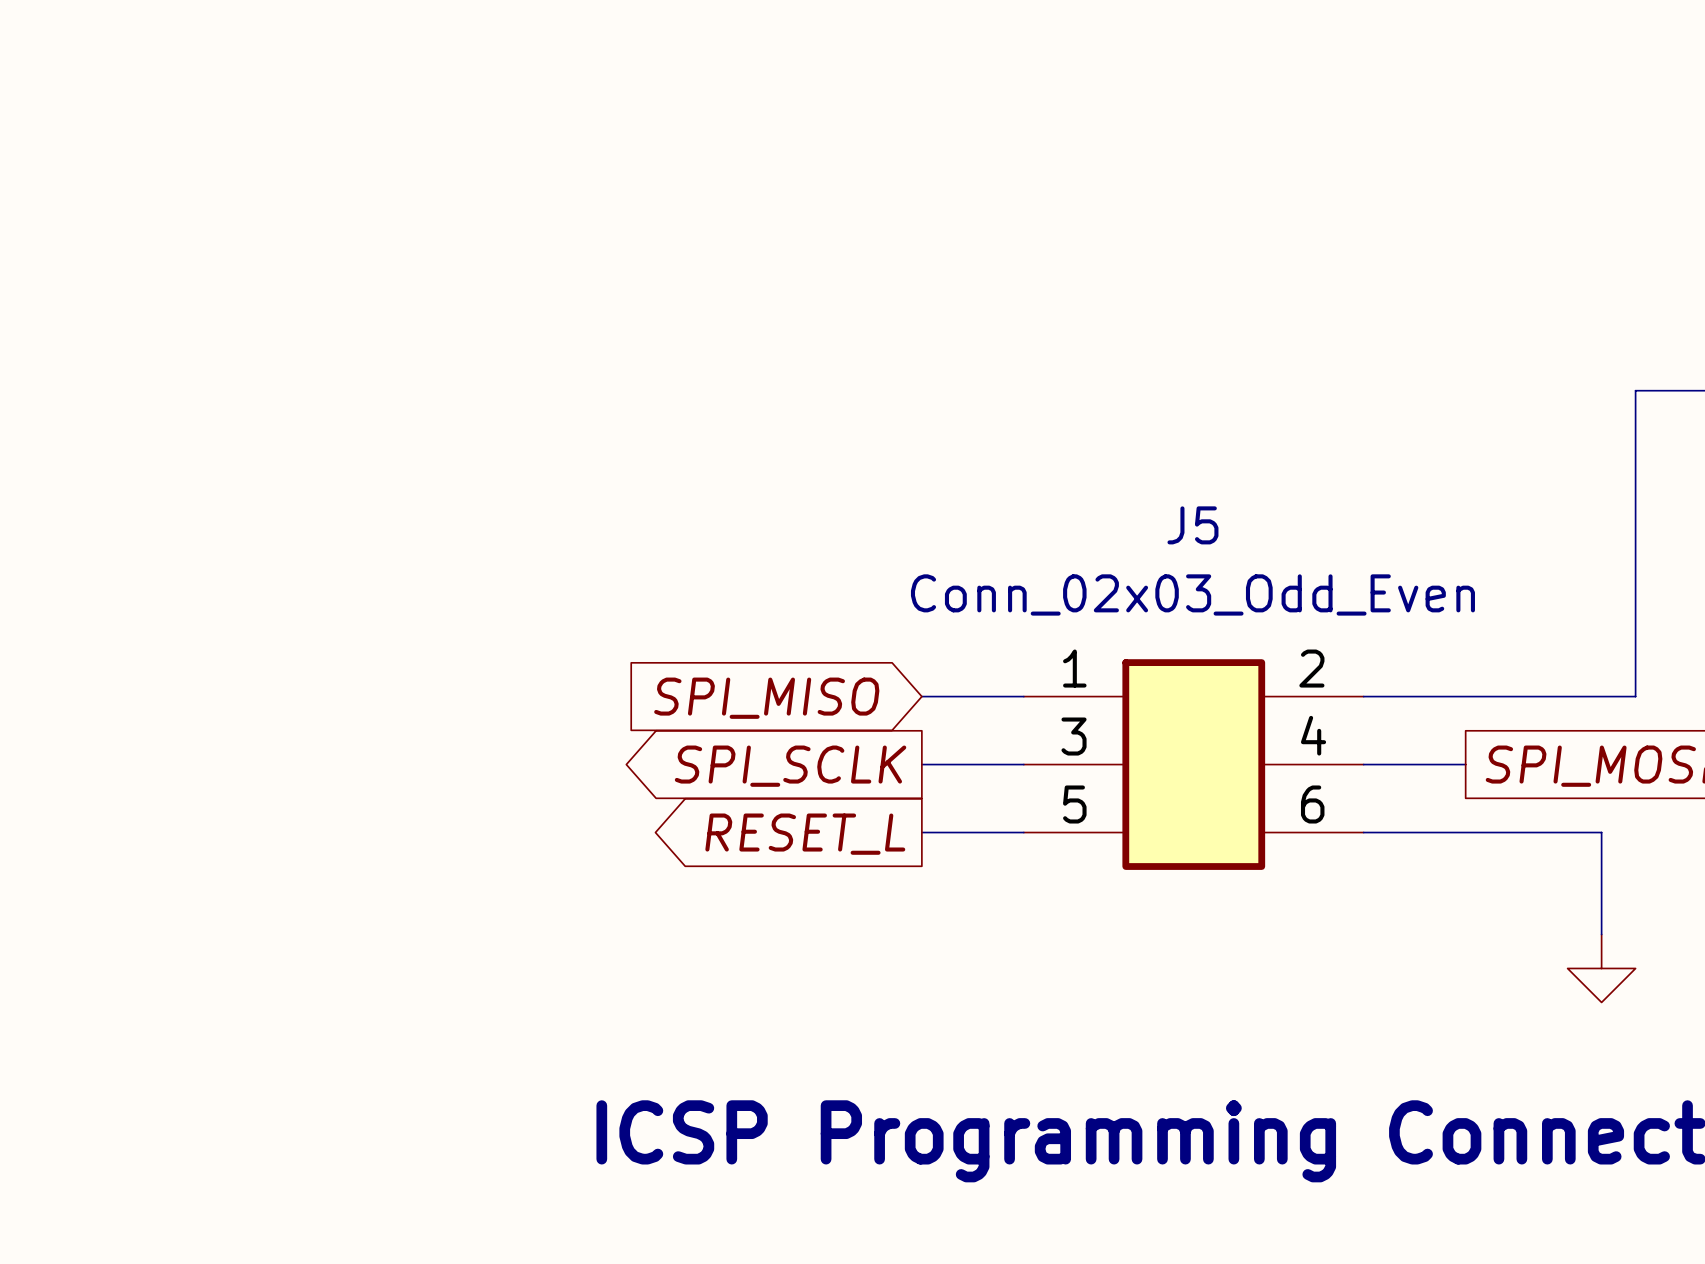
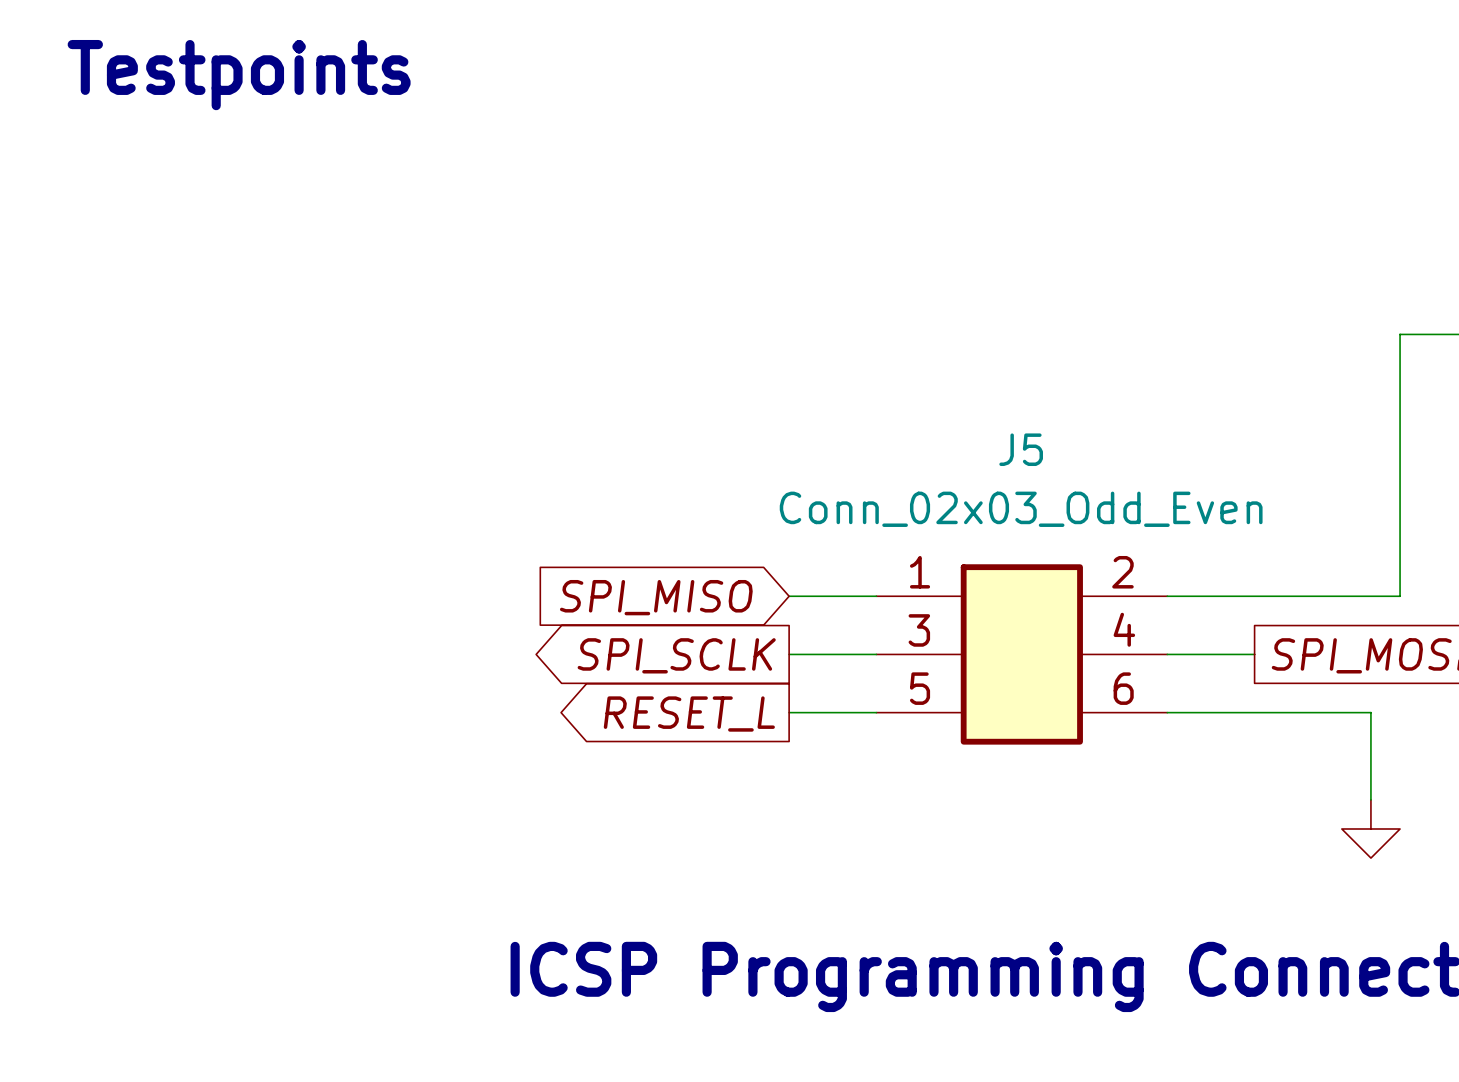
text: none -> Testpoints (239, 75)

